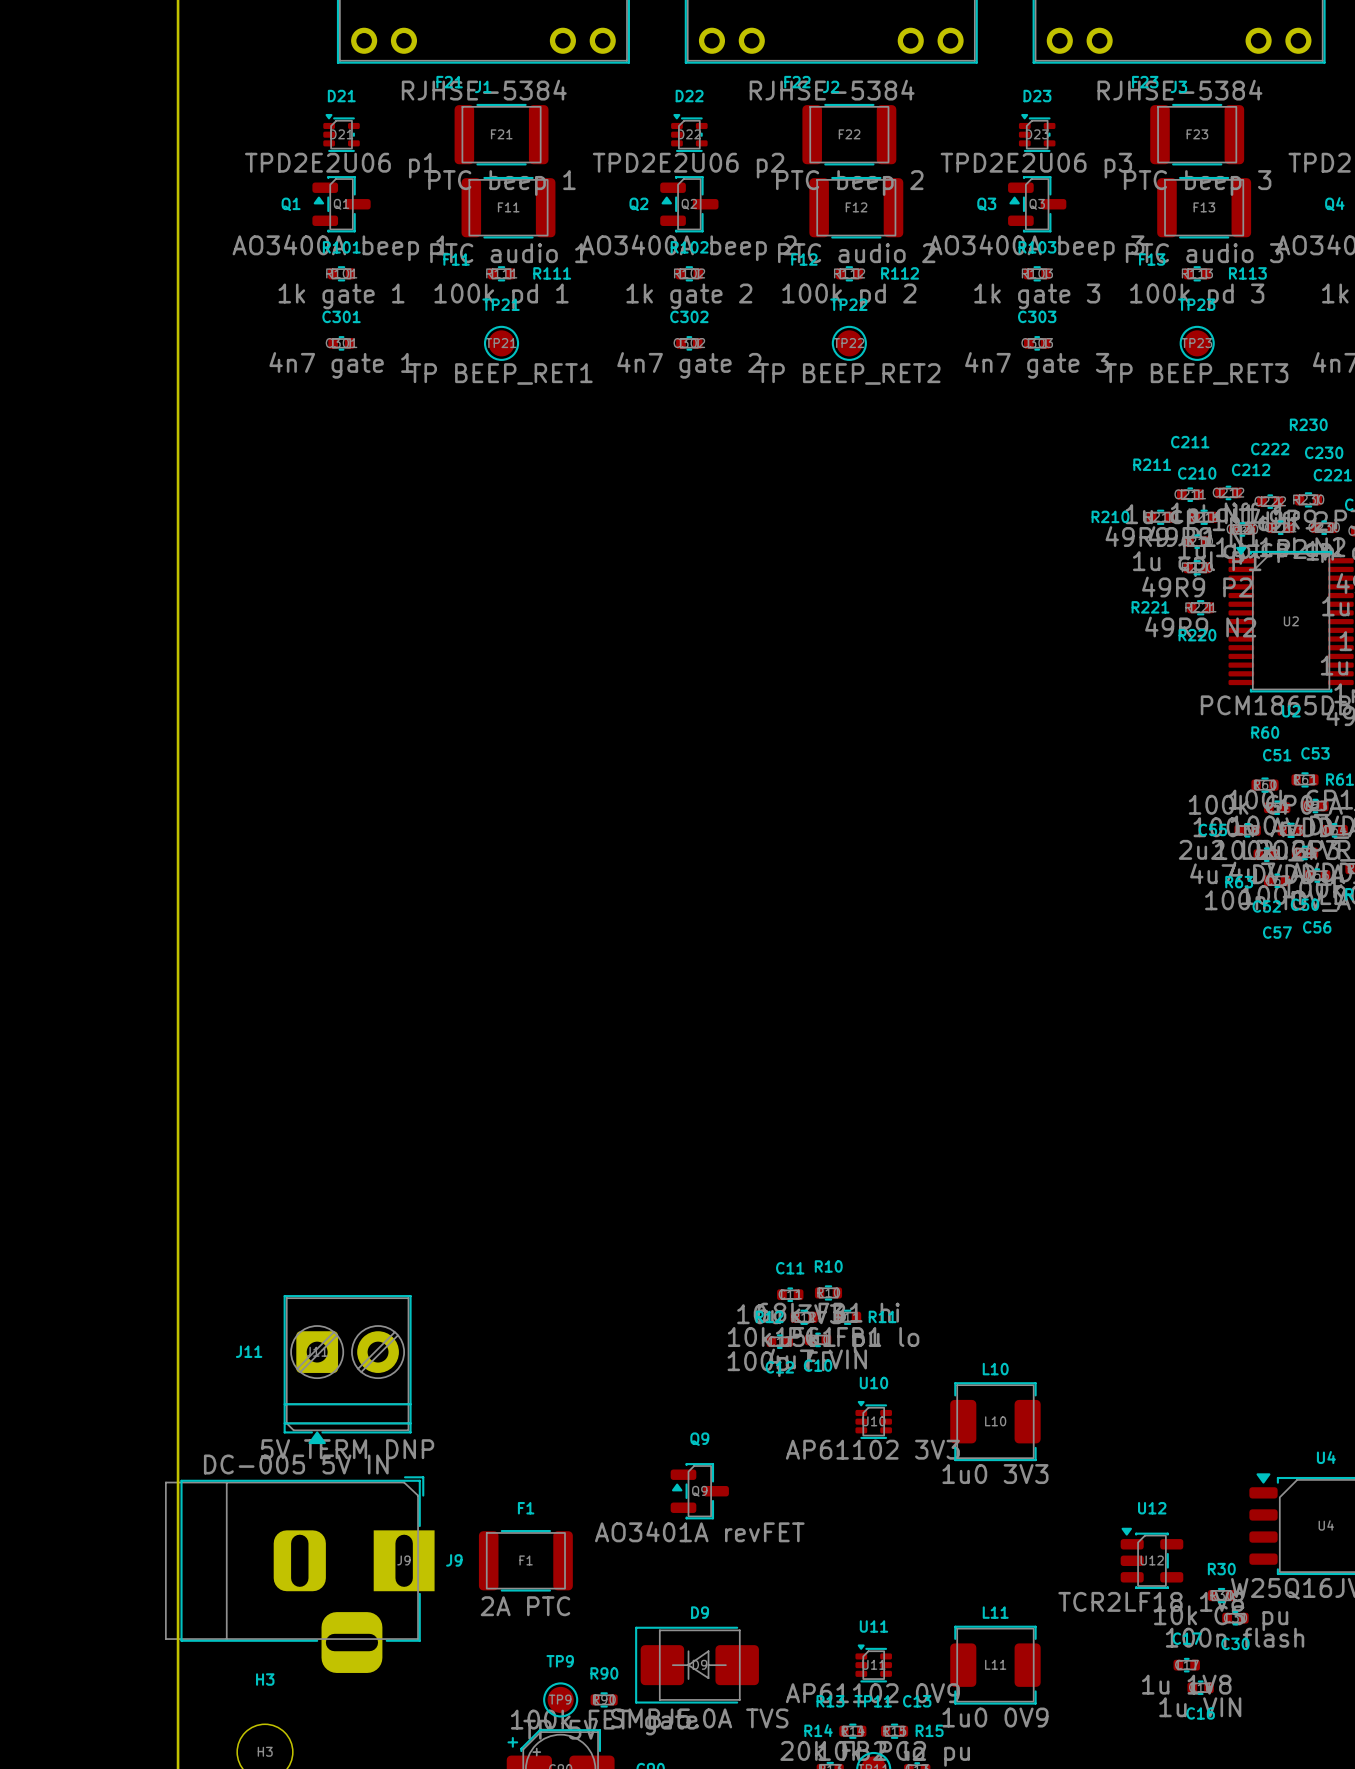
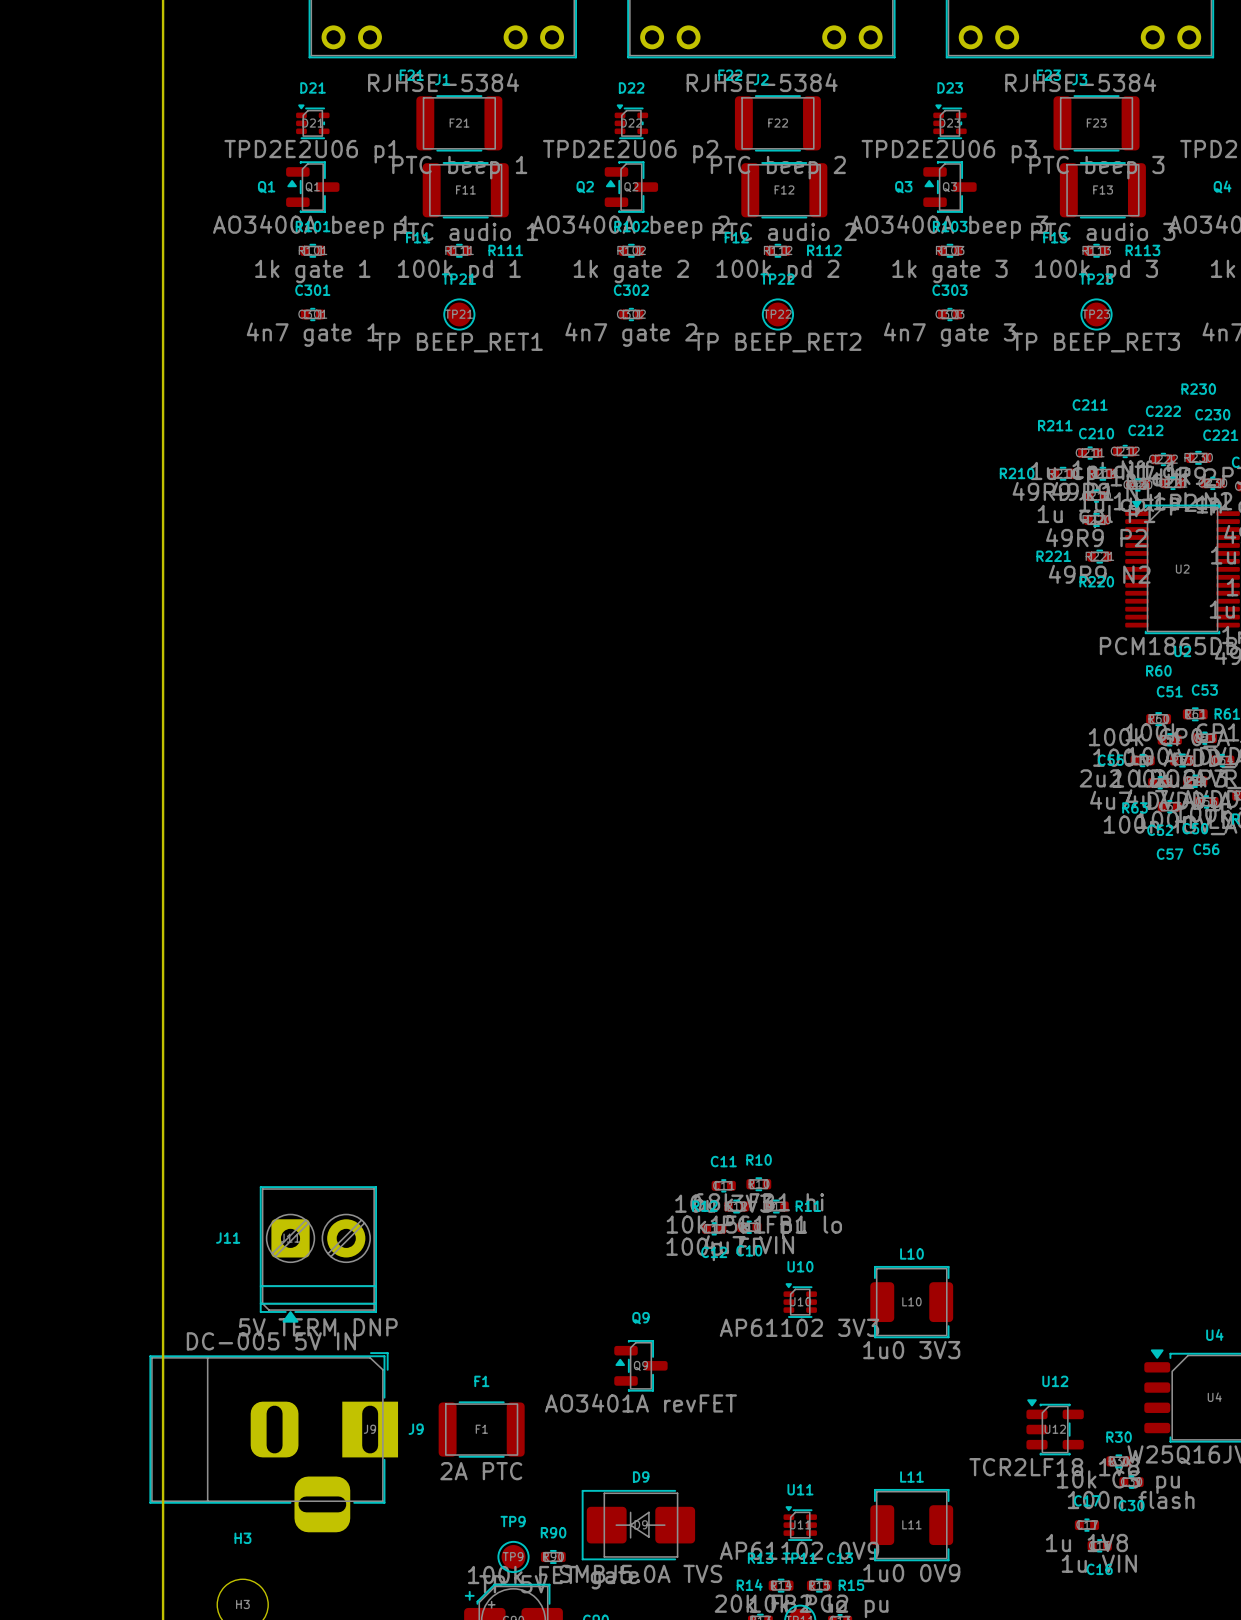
J9 footprint: [165, 1476, 435, 1673] -> [149, 1352, 399, 1533]

